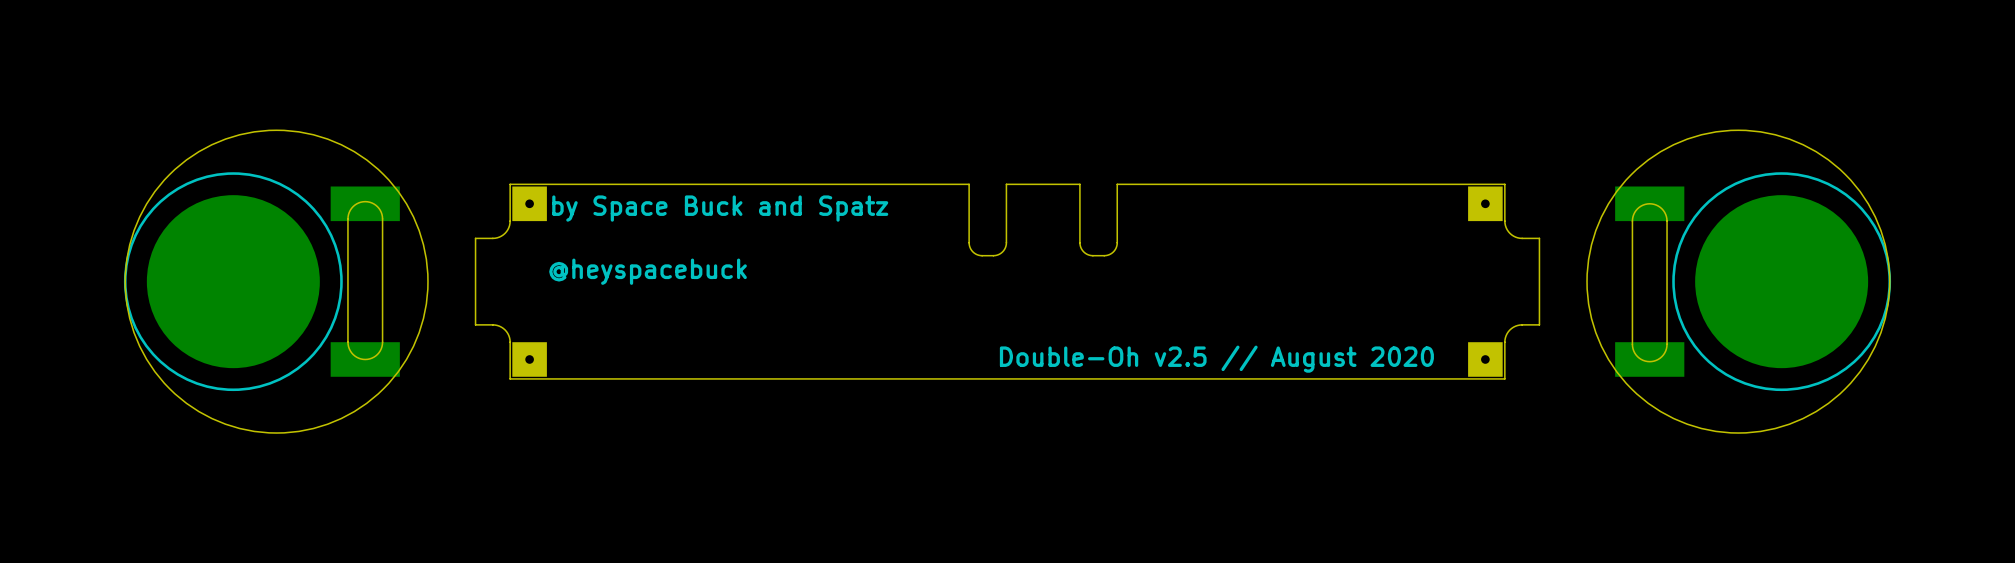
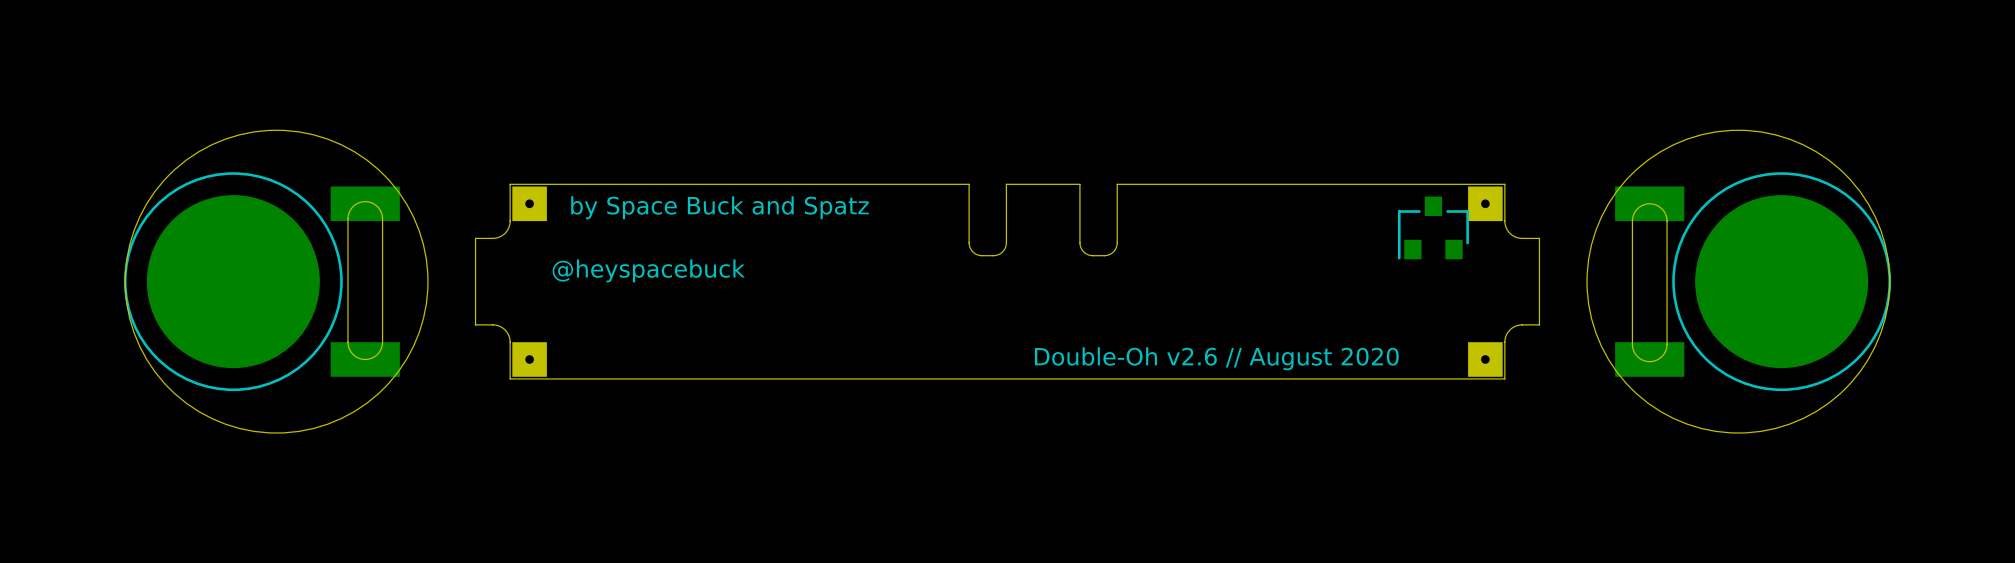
part: none -> (1433, 228)
text: Double-Oh v2.5 // August 2020 (1216, 359) -> Double-Oh v2.6 // August 2020 (1216, 358)

